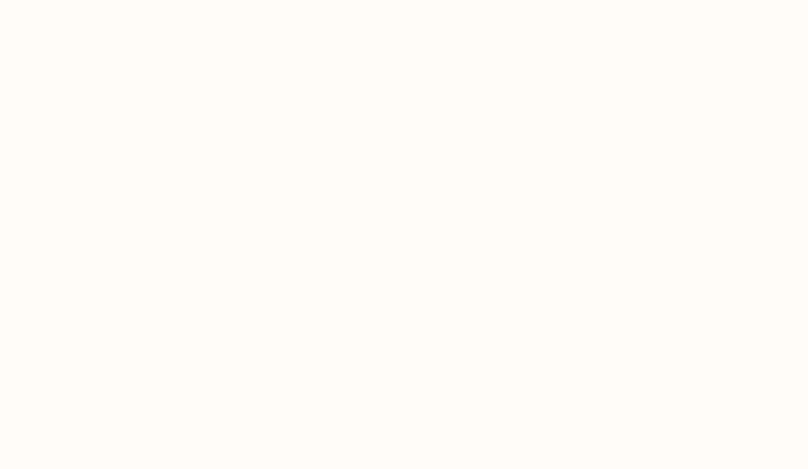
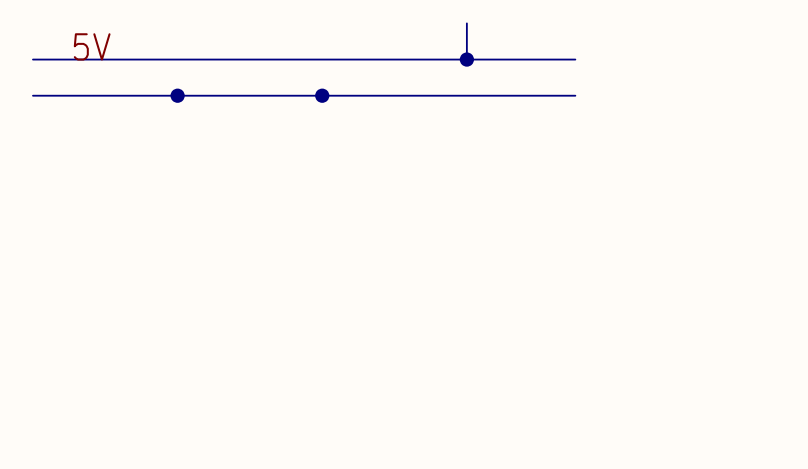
wire: none -> (466, 23) (466, 59)
label: none -> 5V (92, 46)
wire: none -> (32, 59) (575, 59)
junction: none -> (466, 59)
wire: none -> (32, 95) (575, 95)
junction: none -> (177, 95)
junction: none -> (322, 95)

